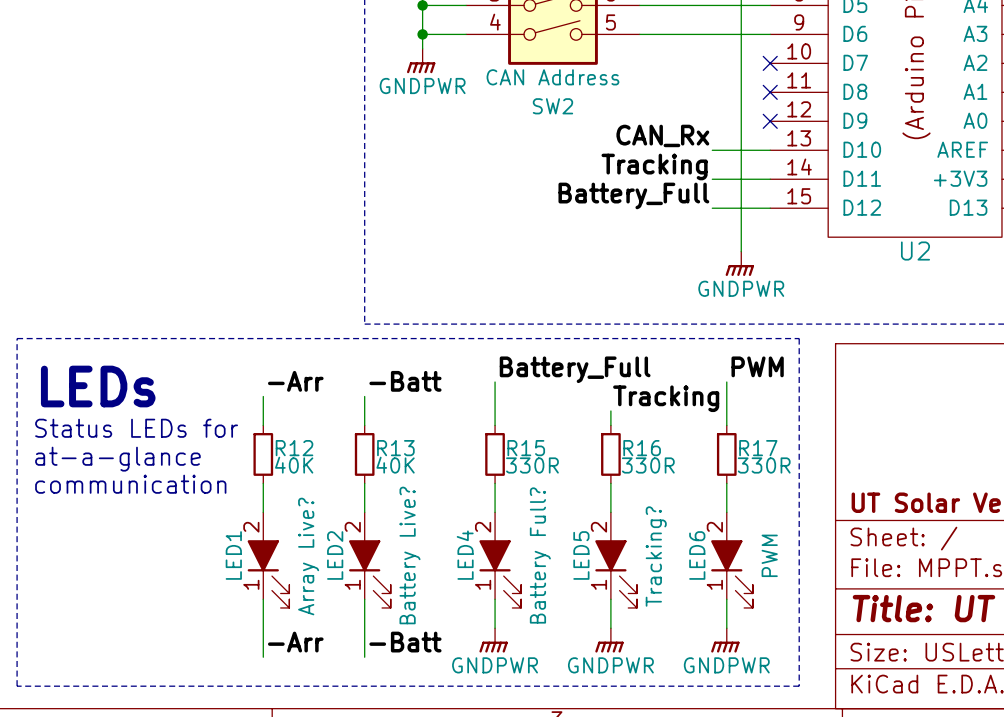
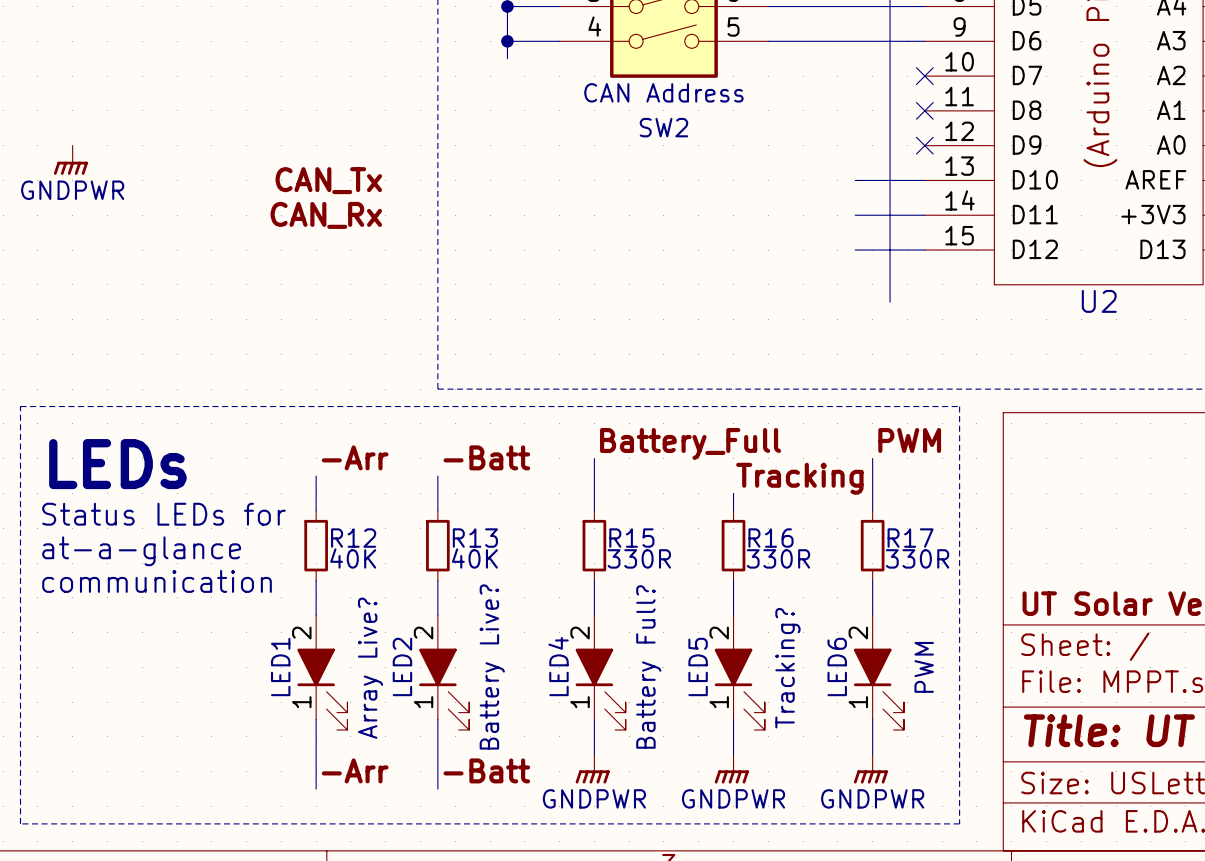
power symbol: GNDPWR (421, 61) -> none
power symbol: none -> GNDPWR (70, 160)
label: CAN_Rx (662, 135) -> none
label: none -> CAN_Tx (328, 180)
label: Tracking (654, 166) -> none
label: none -> CAN_Rx (326, 215)
label: Battery_Full (633, 195) -> none
power symbol: GNDPWR (739, 263) -> none

